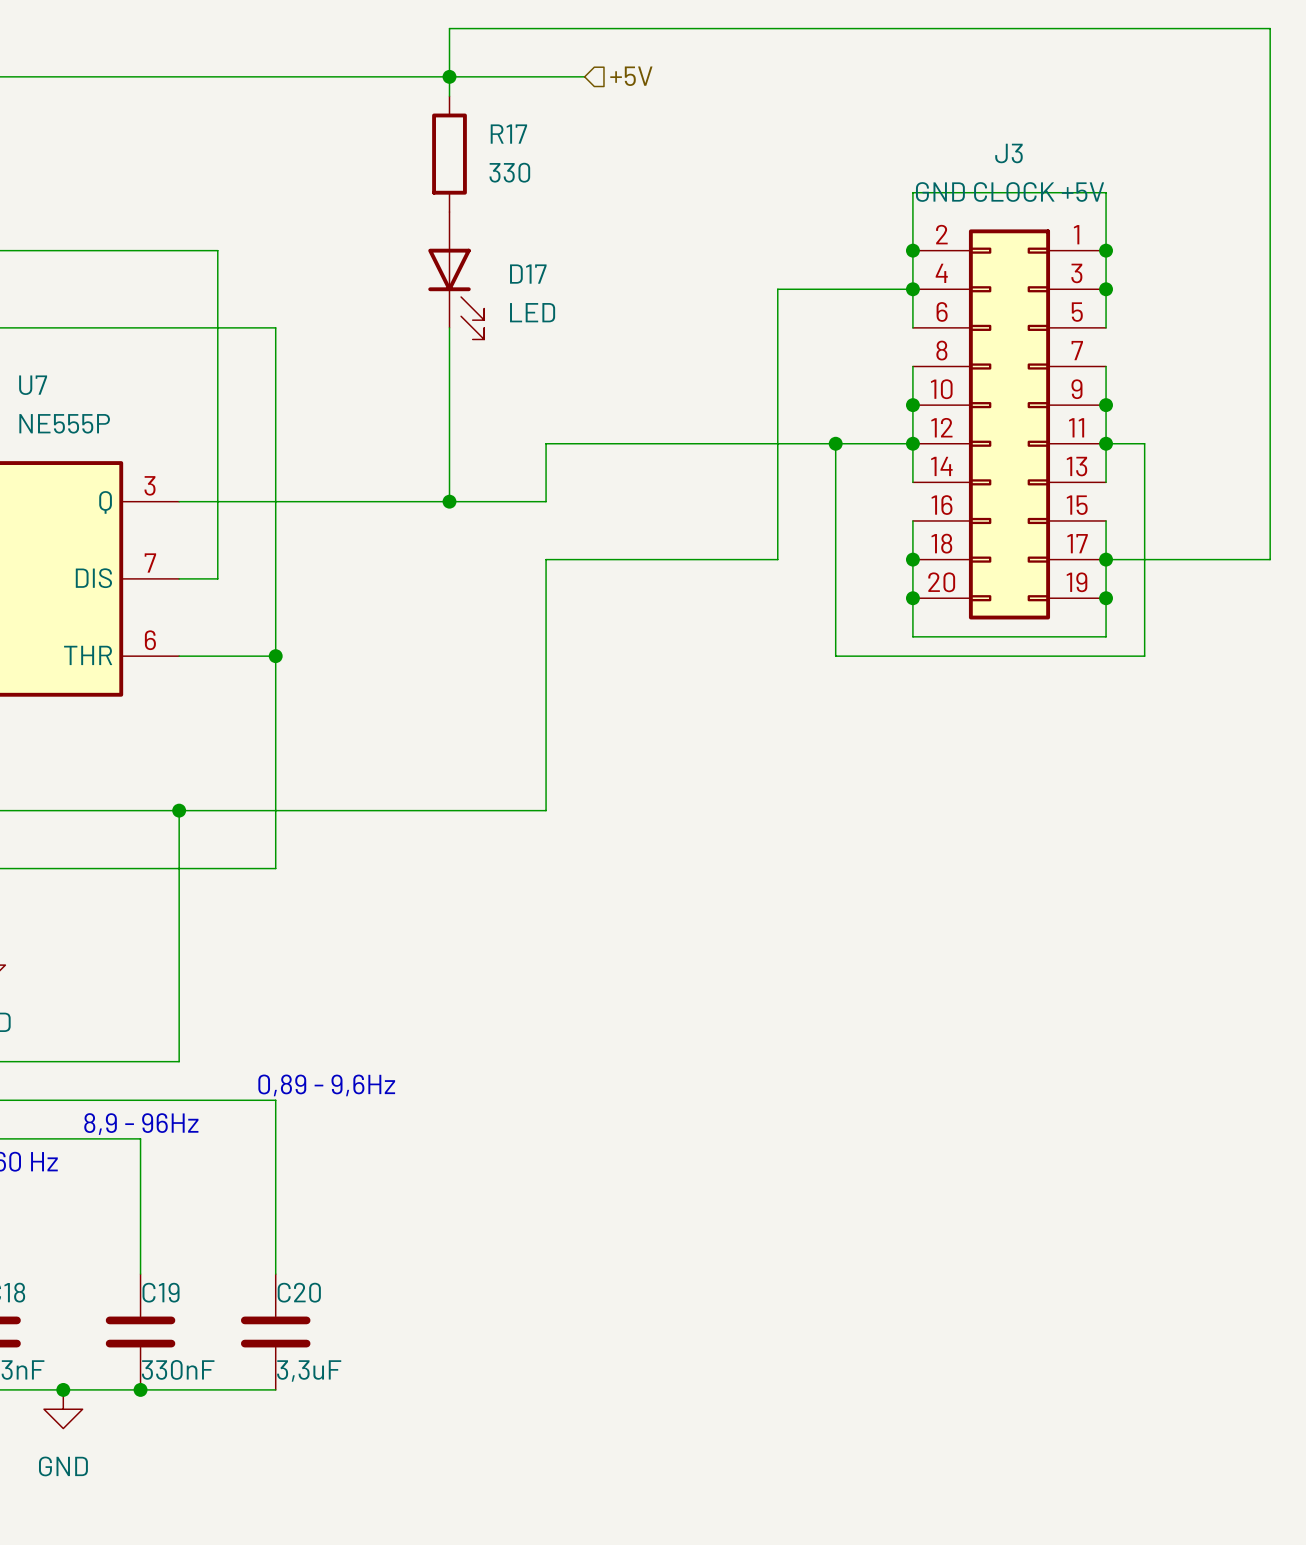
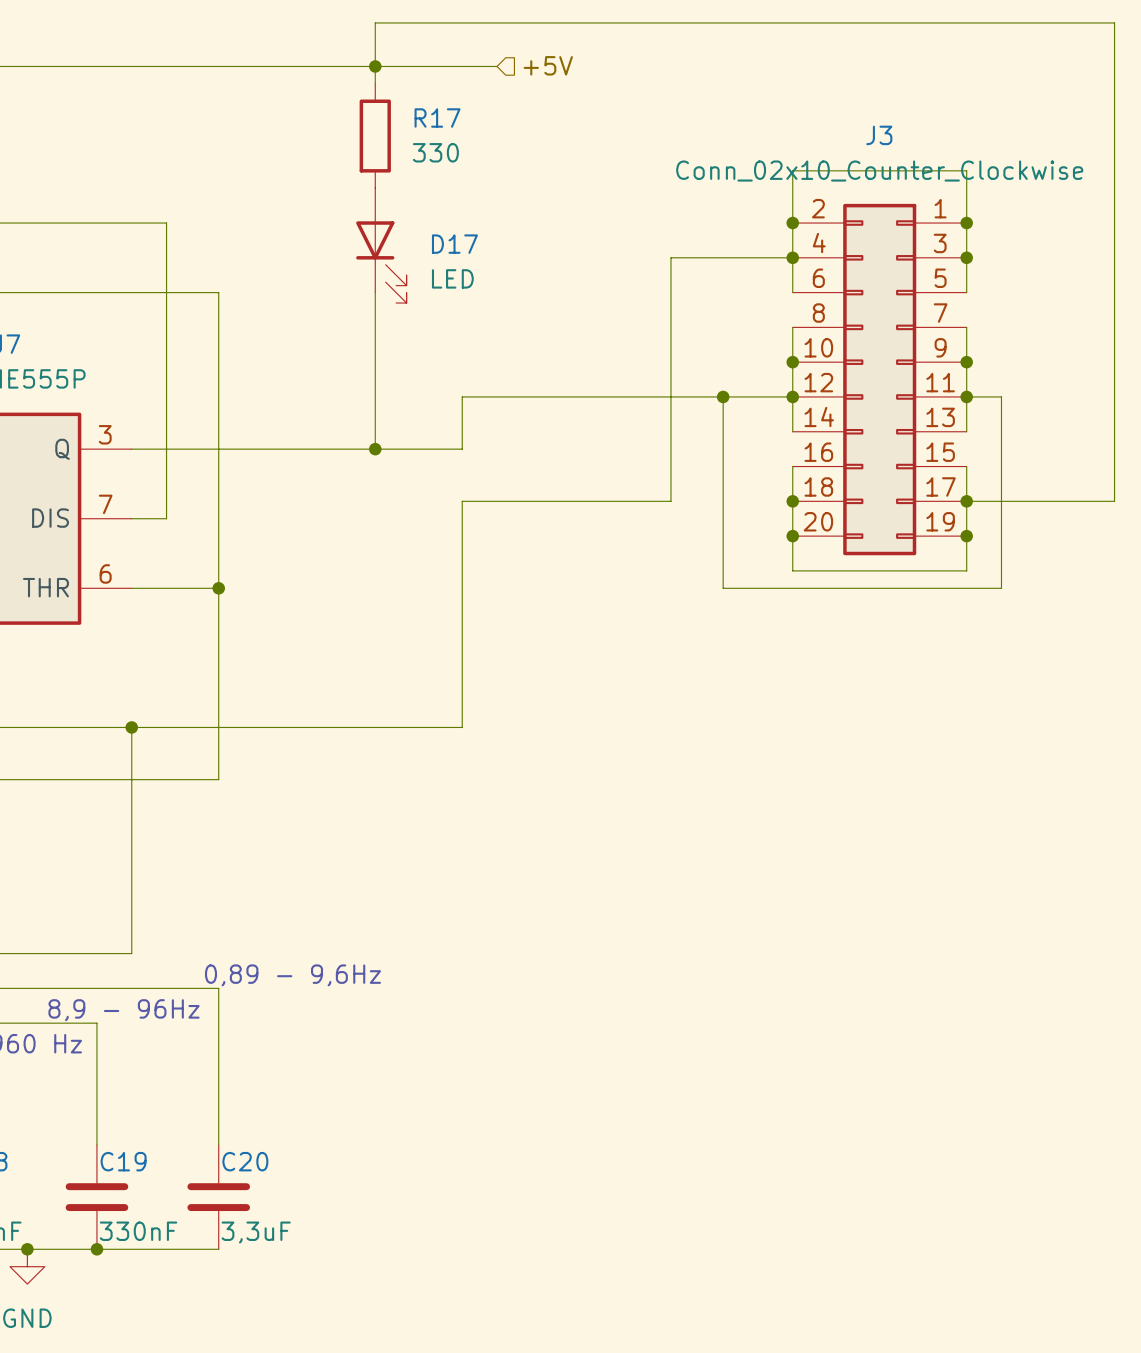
J3 value: GND CLOCK +5V (1010, 192) -> Conn_02x10_Counter_Clockwise (879, 171)

